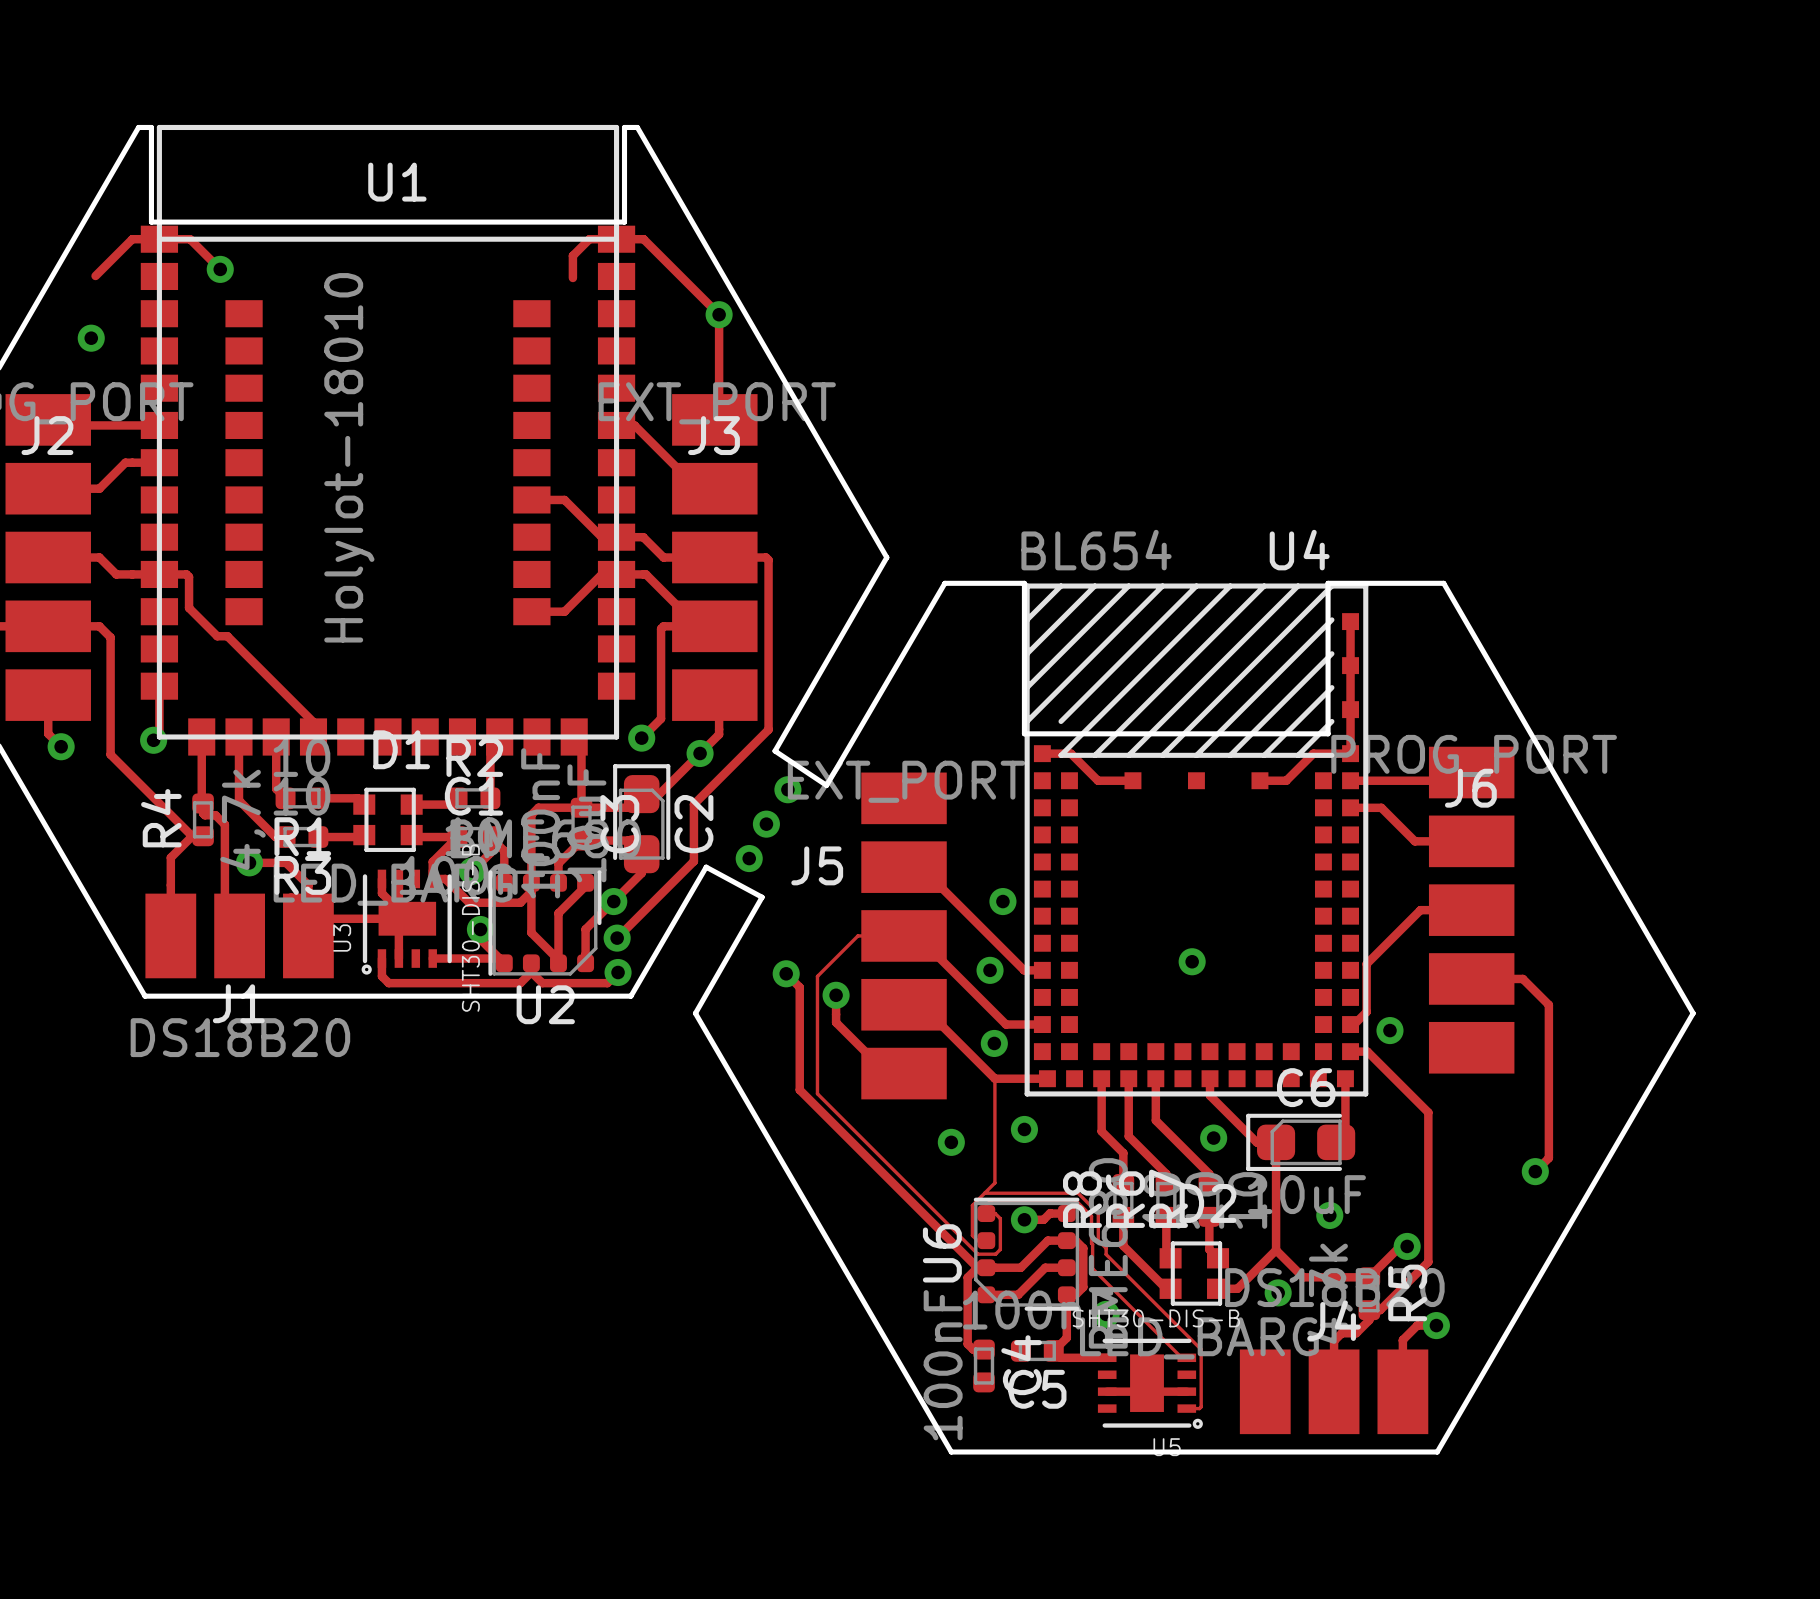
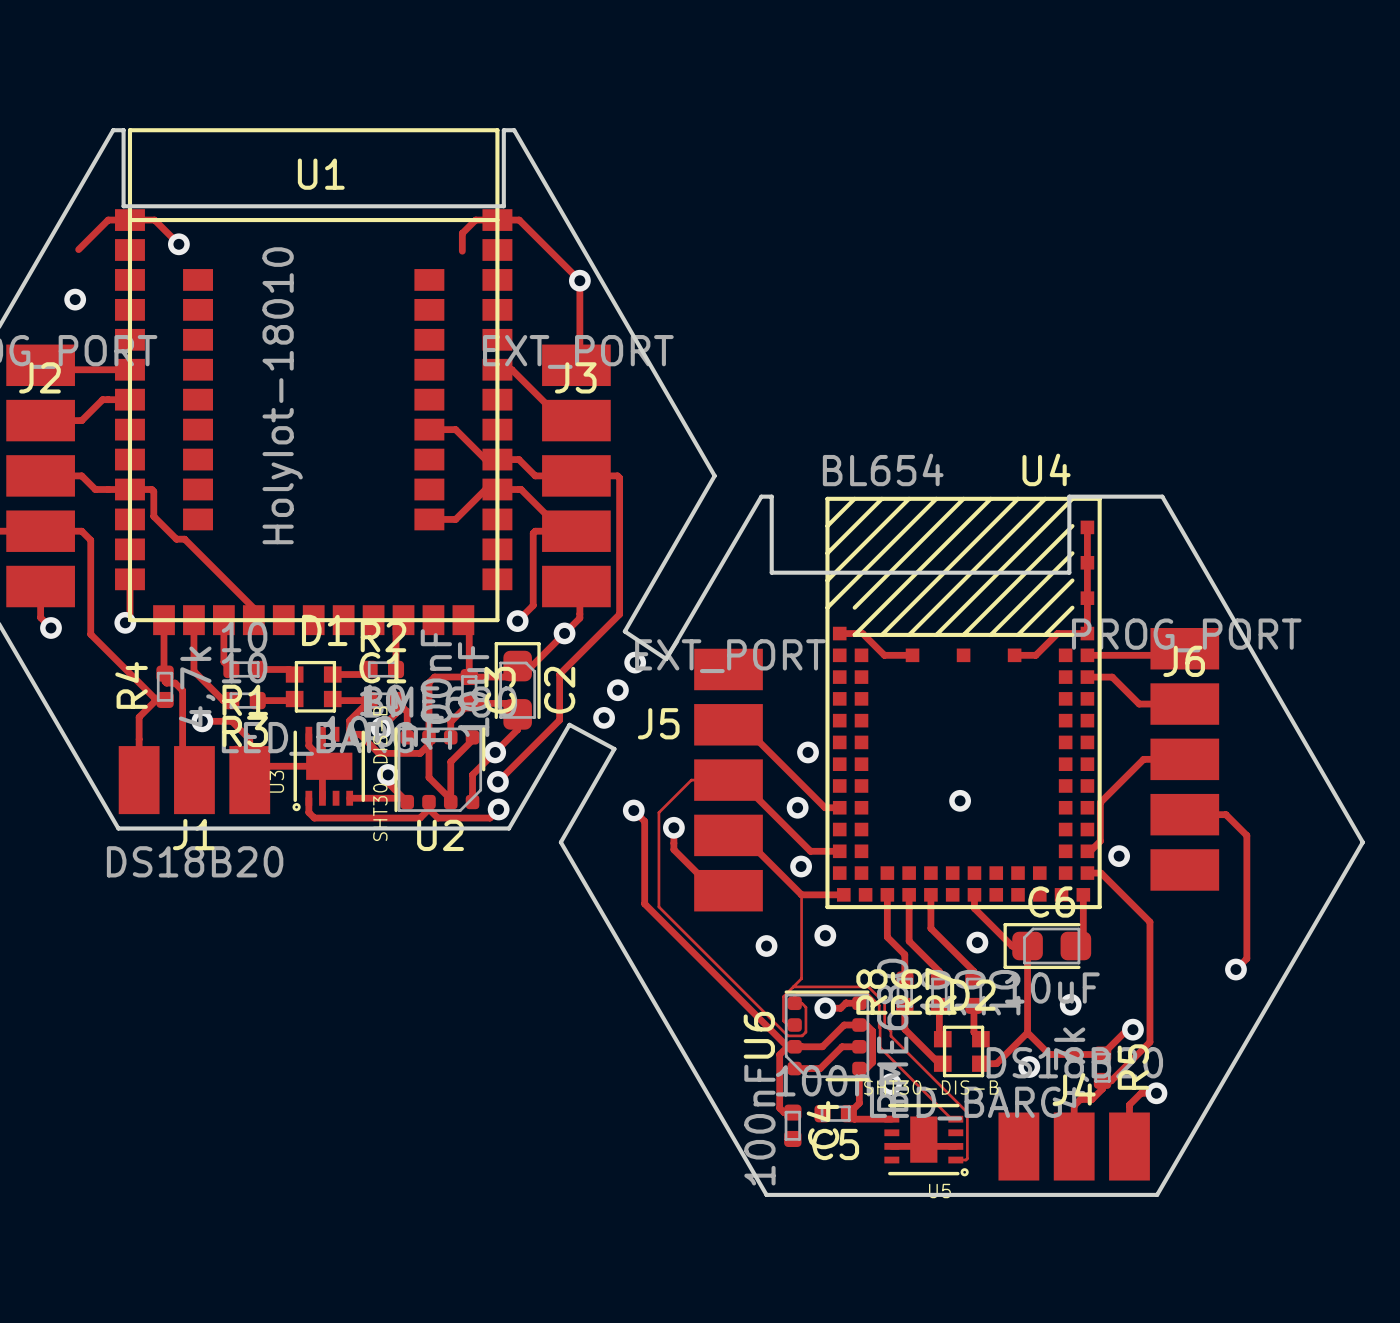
board edge: (957, 583) (1024, 583) (1024, 733) (1328, 733) (1328, 677) -> (771, 496) (771, 572) (1069, 572)

